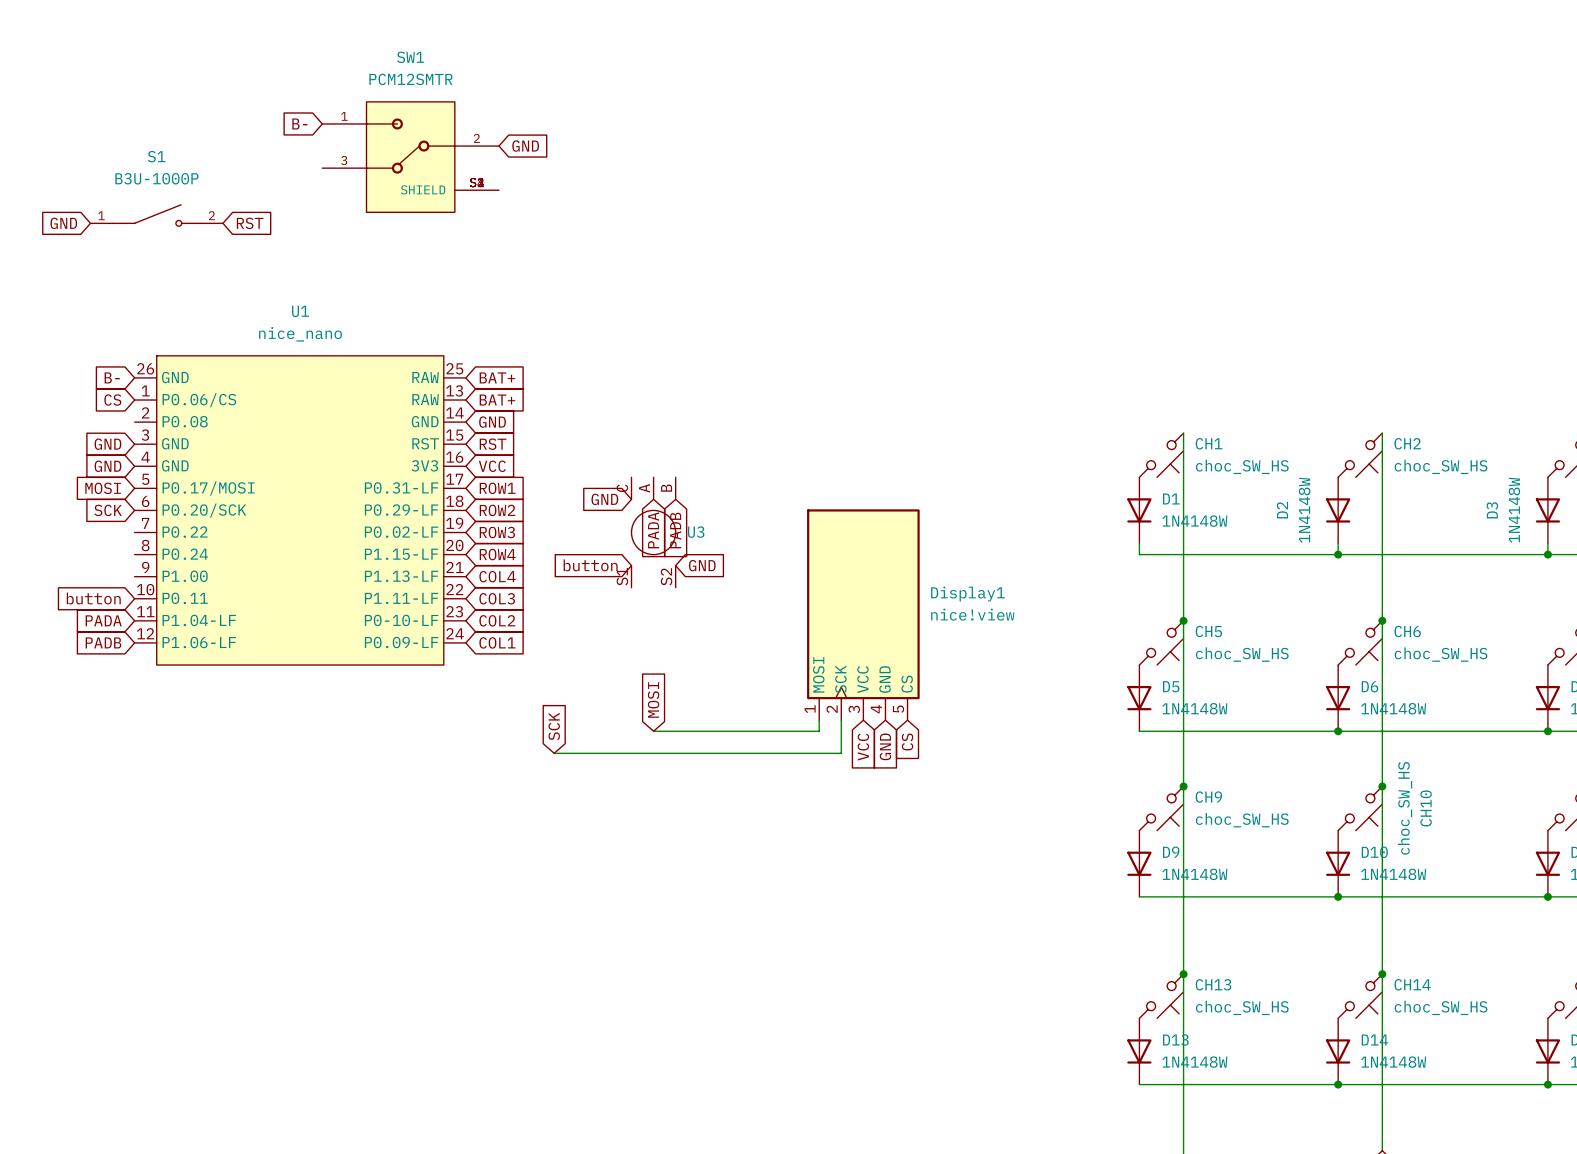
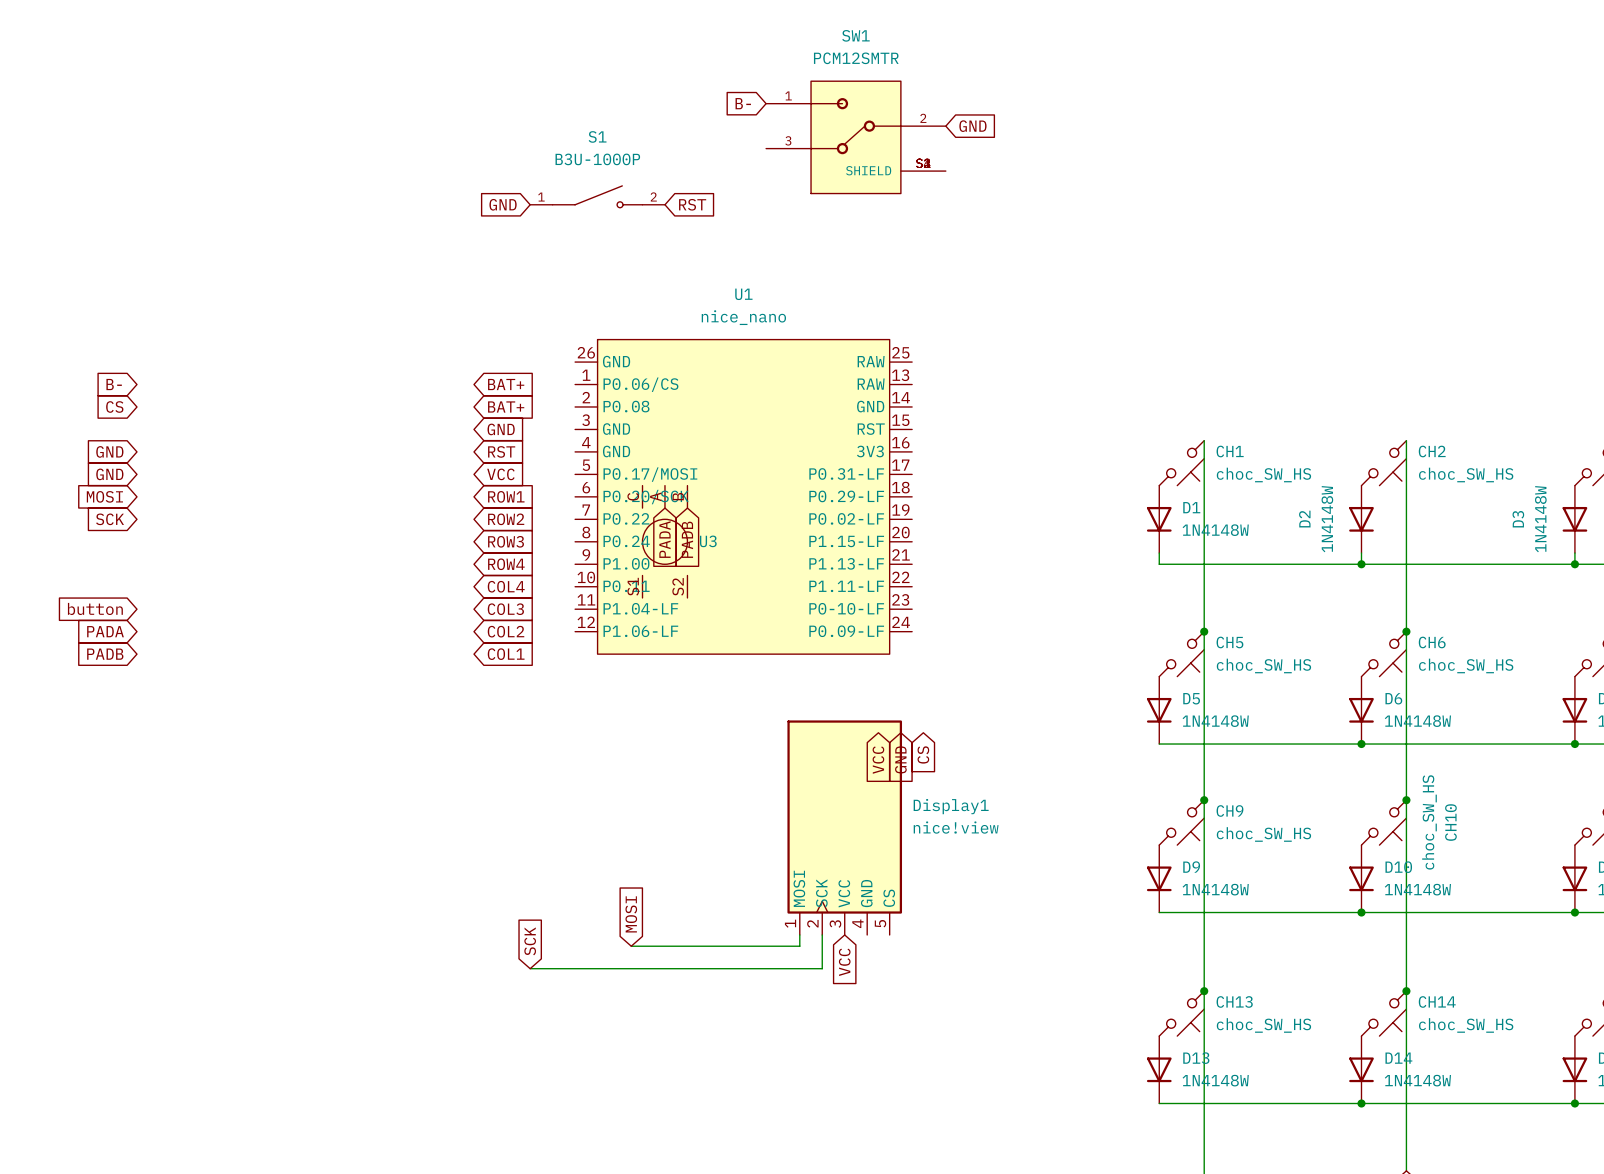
global label: none -> B- (743, 103)
global label: B- (299, 123) -> none
global label: none -> GND (972, 126)
global label rotation: 0° (525, 146) -> 180° (503, 204)
global label position: GND (525, 146) -> GND (503, 204)
SW1 position: (410, 157) -> (855, 137)
global label: none -> RST (692, 204)
S1 position: (156, 215) -> (597, 196)
global label: GND (63, 223) -> none
global label: RST (250, 223) -> none
global label: GND (604, 499) -> none
U1 position: (300, 510) -> (743, 496)
global label: button (590, 565) -> none
global label: GND (702, 565) -> none
Display1 position: (863, 614) -> (844, 827)
global label position: MOSI (653, 699) -> MOSI (631, 914)
wire: (819, 720) (819, 731) (653, 731) -> (799, 934) (799, 946) (631, 946)
wire: (841, 720) (841, 753) (554, 753) -> (822, 934) (822, 968) (530, 968)
global label position: SCK (554, 726) -> SCK (530, 941)
global label: none -> VCC (844, 962)

